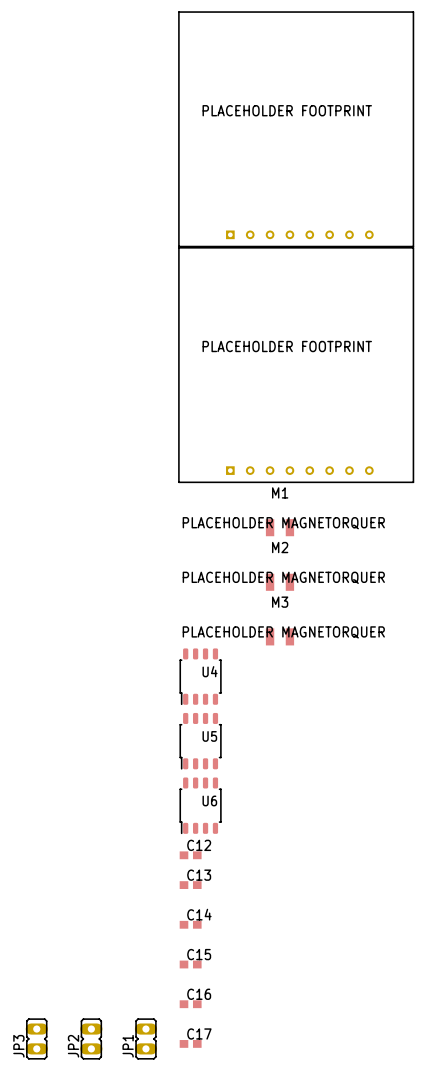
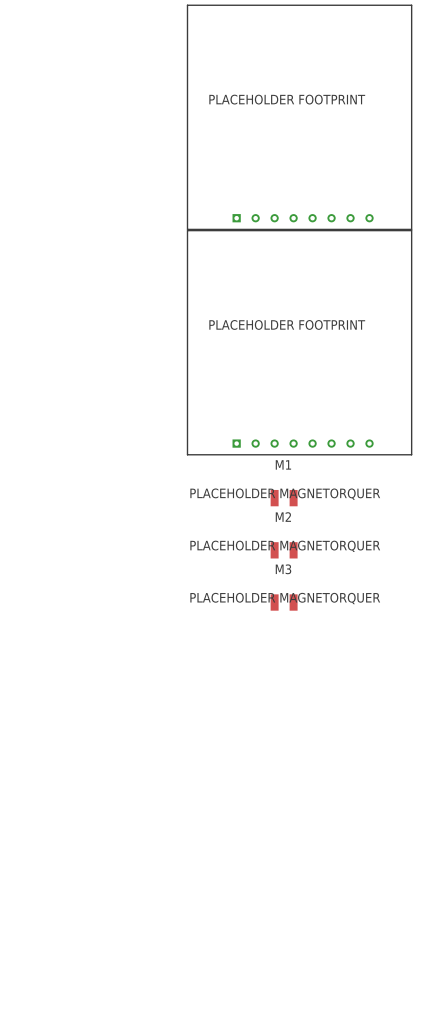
U4: (200, 676) -> none
U5: (200, 741) -> none
U6: (200, 805) -> none
C12: (190, 855) -> none
C13: (190, 885) -> none
C14: (190, 924) -> none
C15: (190, 964) -> none
C16: (190, 1004) -> none
JP3: (36, 1038) -> none
JP2: (91, 1038) -> none
JP1: (145, 1038) -> none
C17: (190, 1043) -> none

